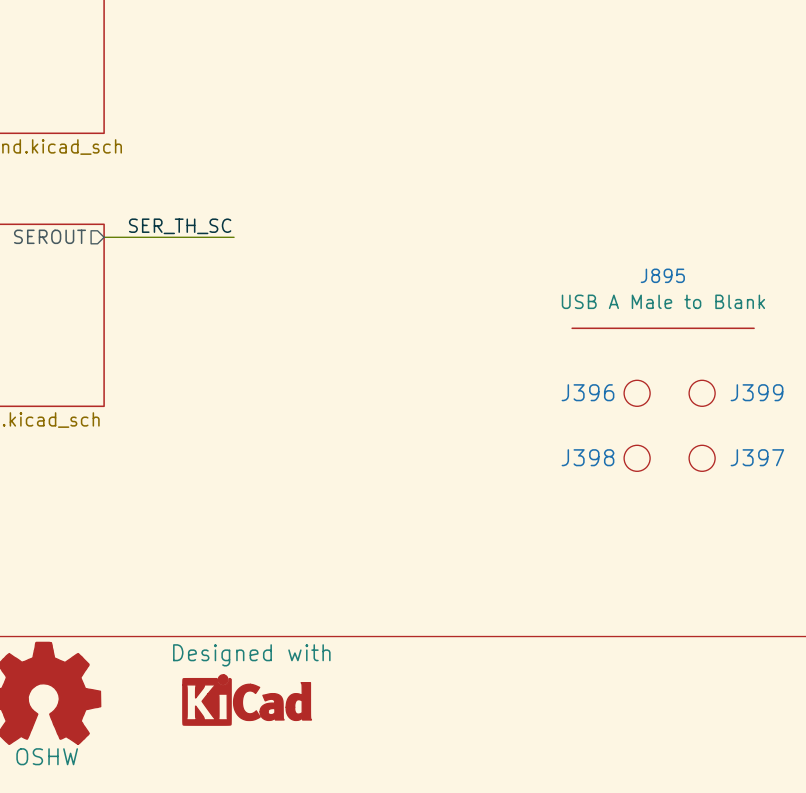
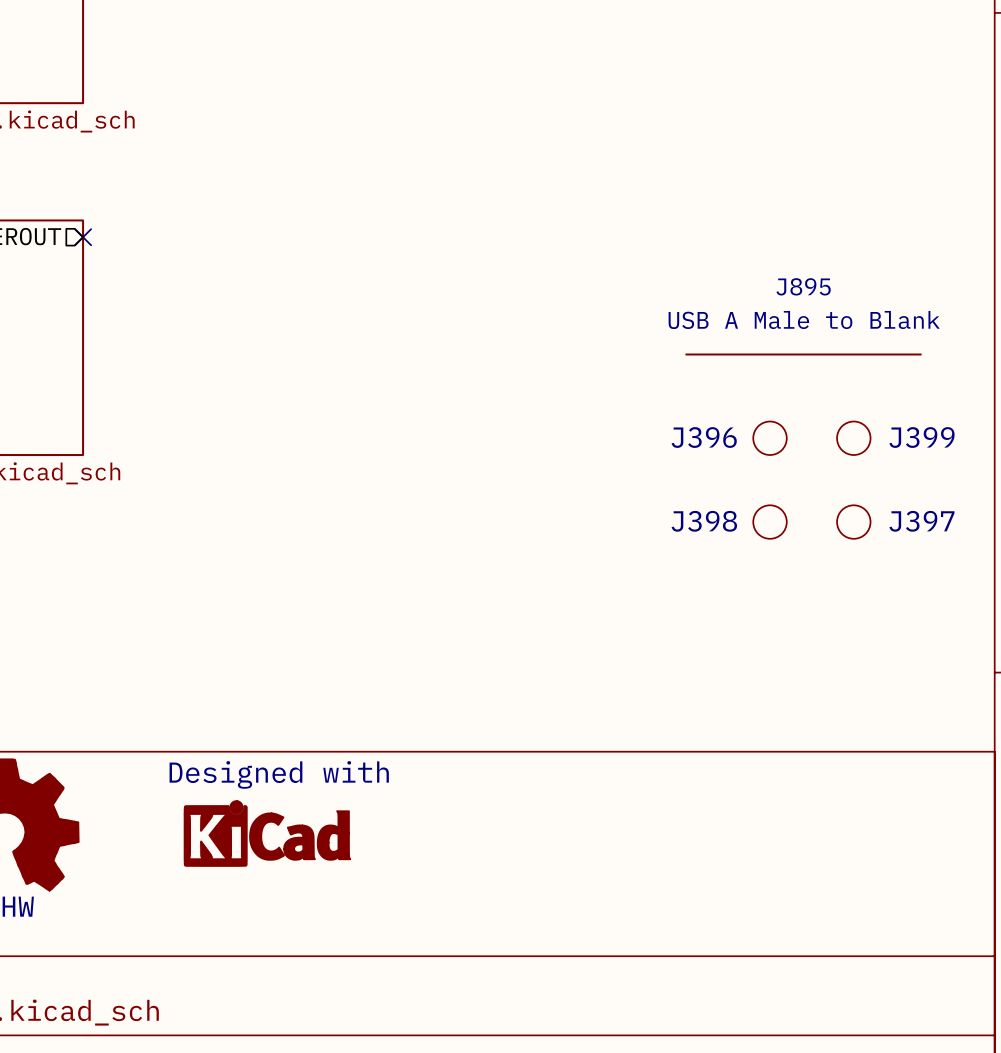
label: SER_TH_SC (180, 226) -> none
wire: (104, 237) (234, 237) -> none
no-connect mark: none -> (83, 237)

